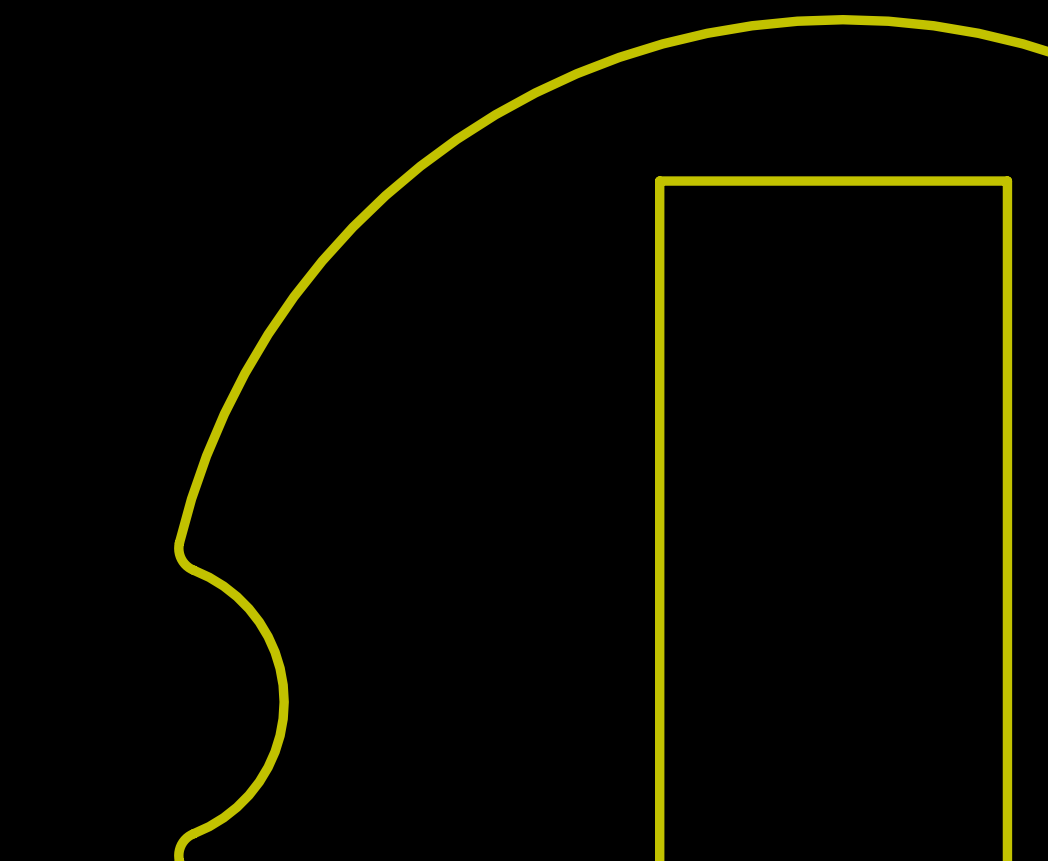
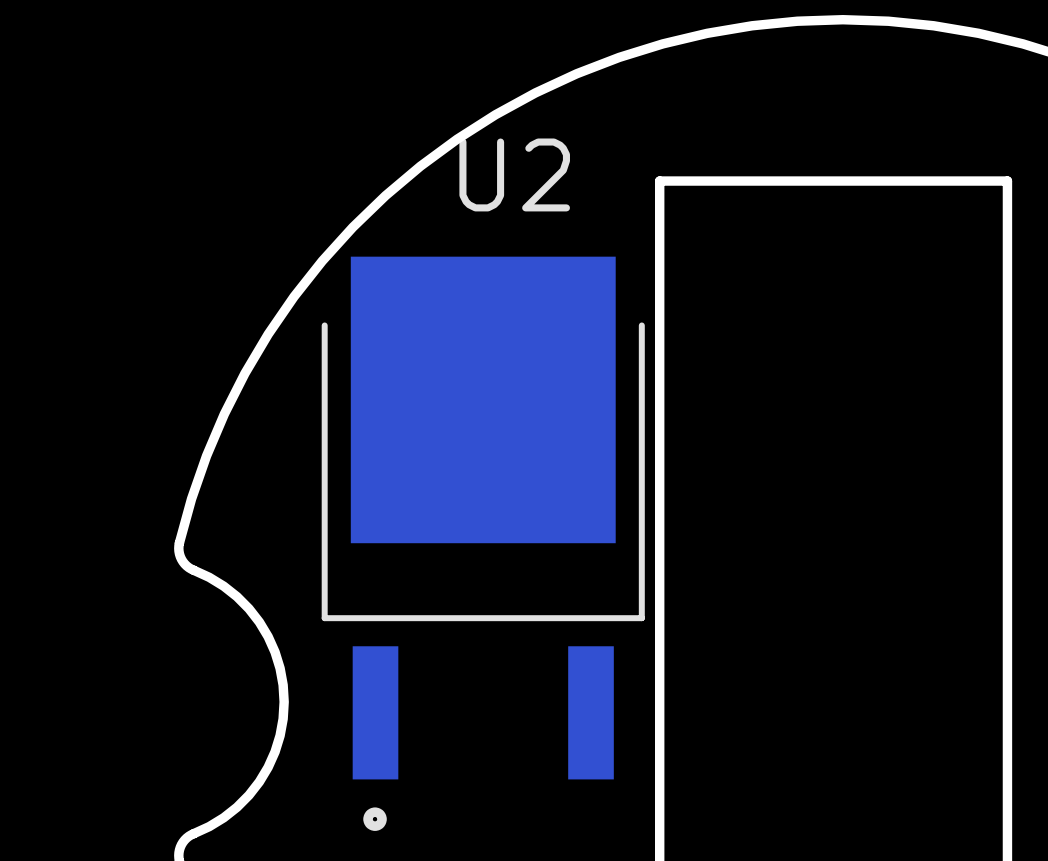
U2: none -> (483, 543)

